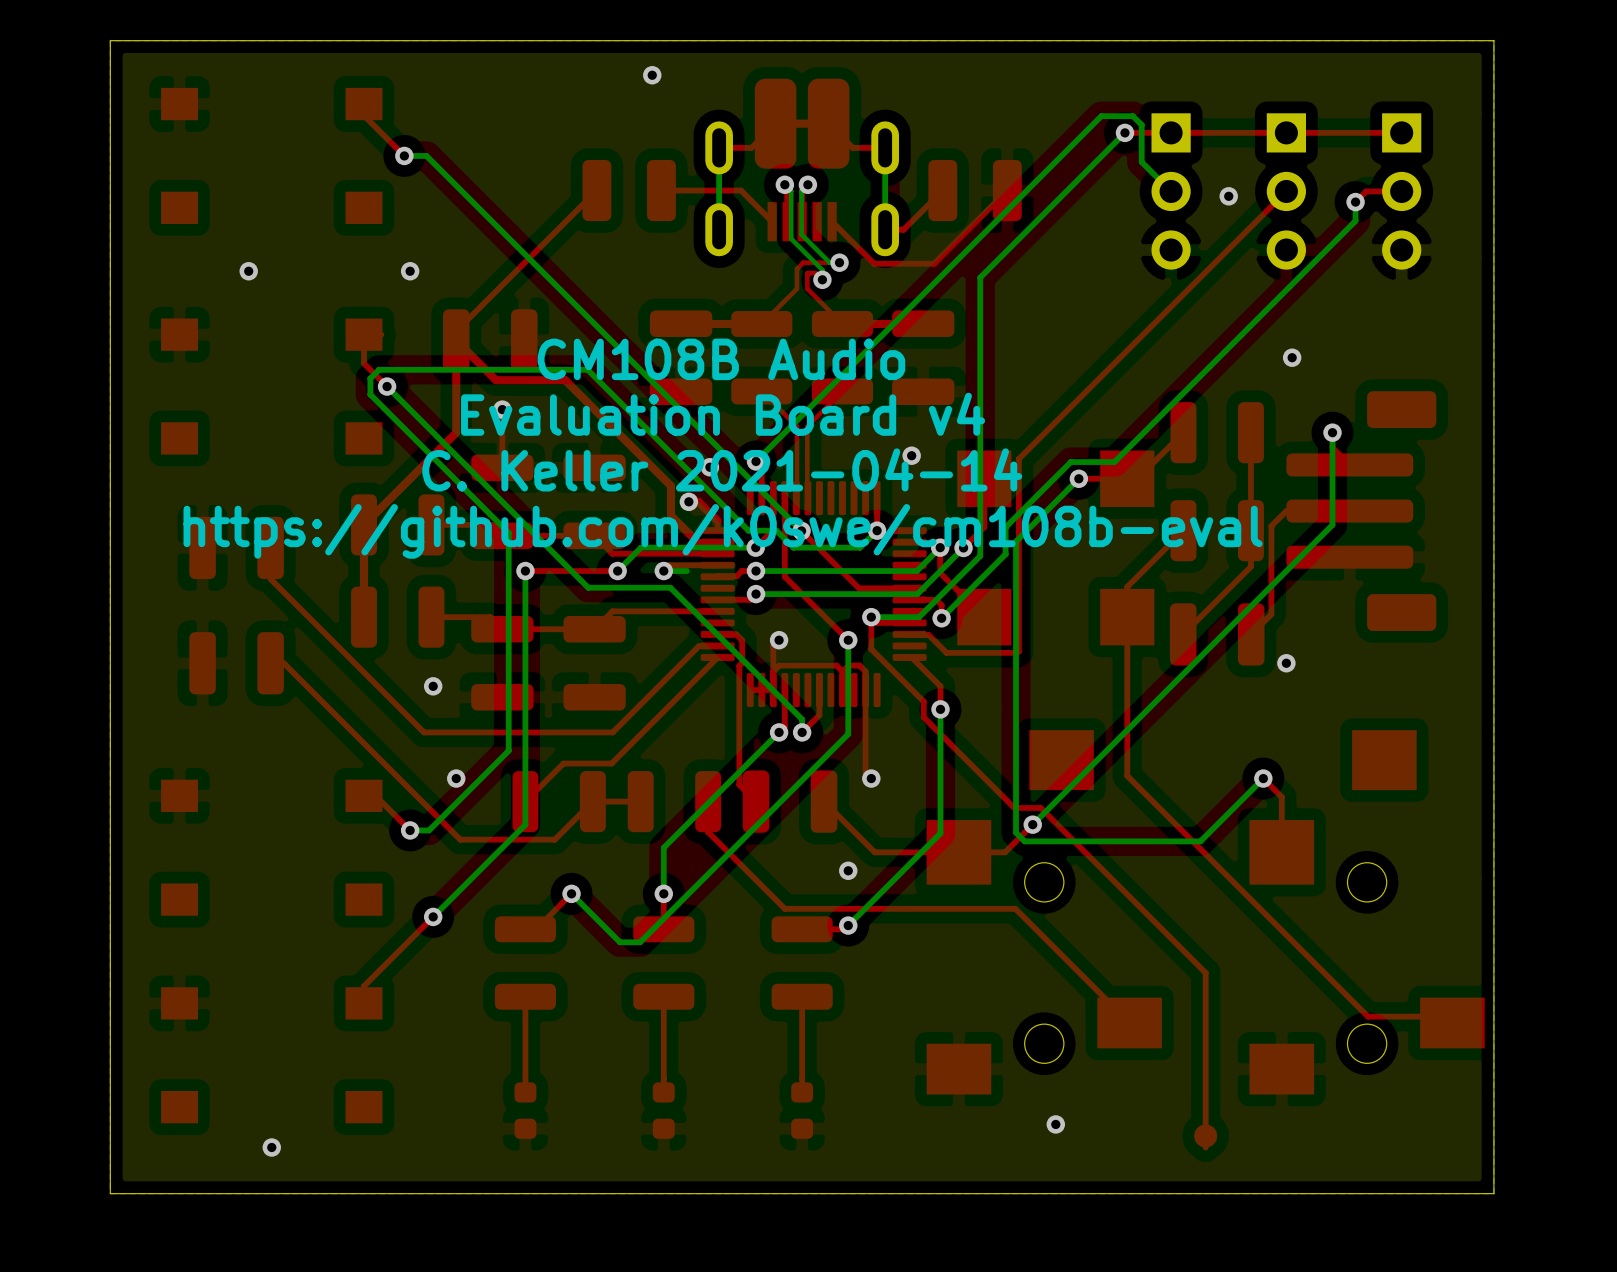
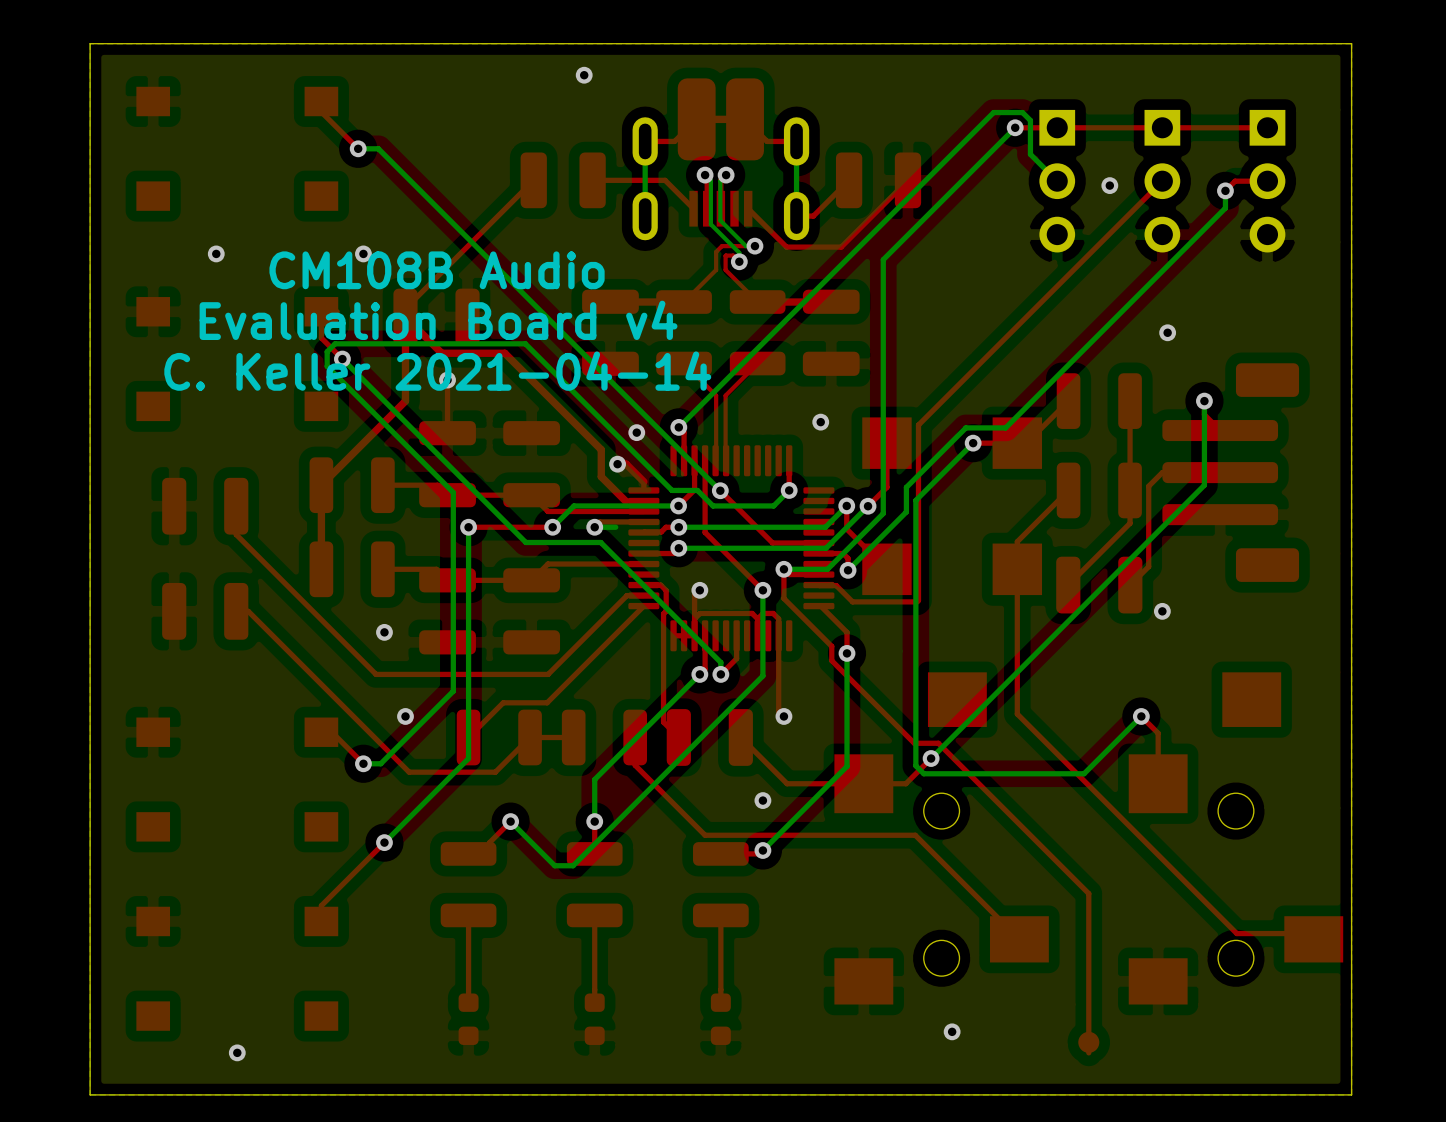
text position: CM108B Audio (721, 359) -> CM108B Audio (437, 270)
text position: Evaluation Board v4 (723, 414) -> Evaluation Board v4 (438, 320)
text position: C. Keller 2021-04-14 (722, 469) -> C. Keller 2021-04-14 (437, 371)
text: https://github.com/k0swe/cm108b-eval (723, 531) -> none

